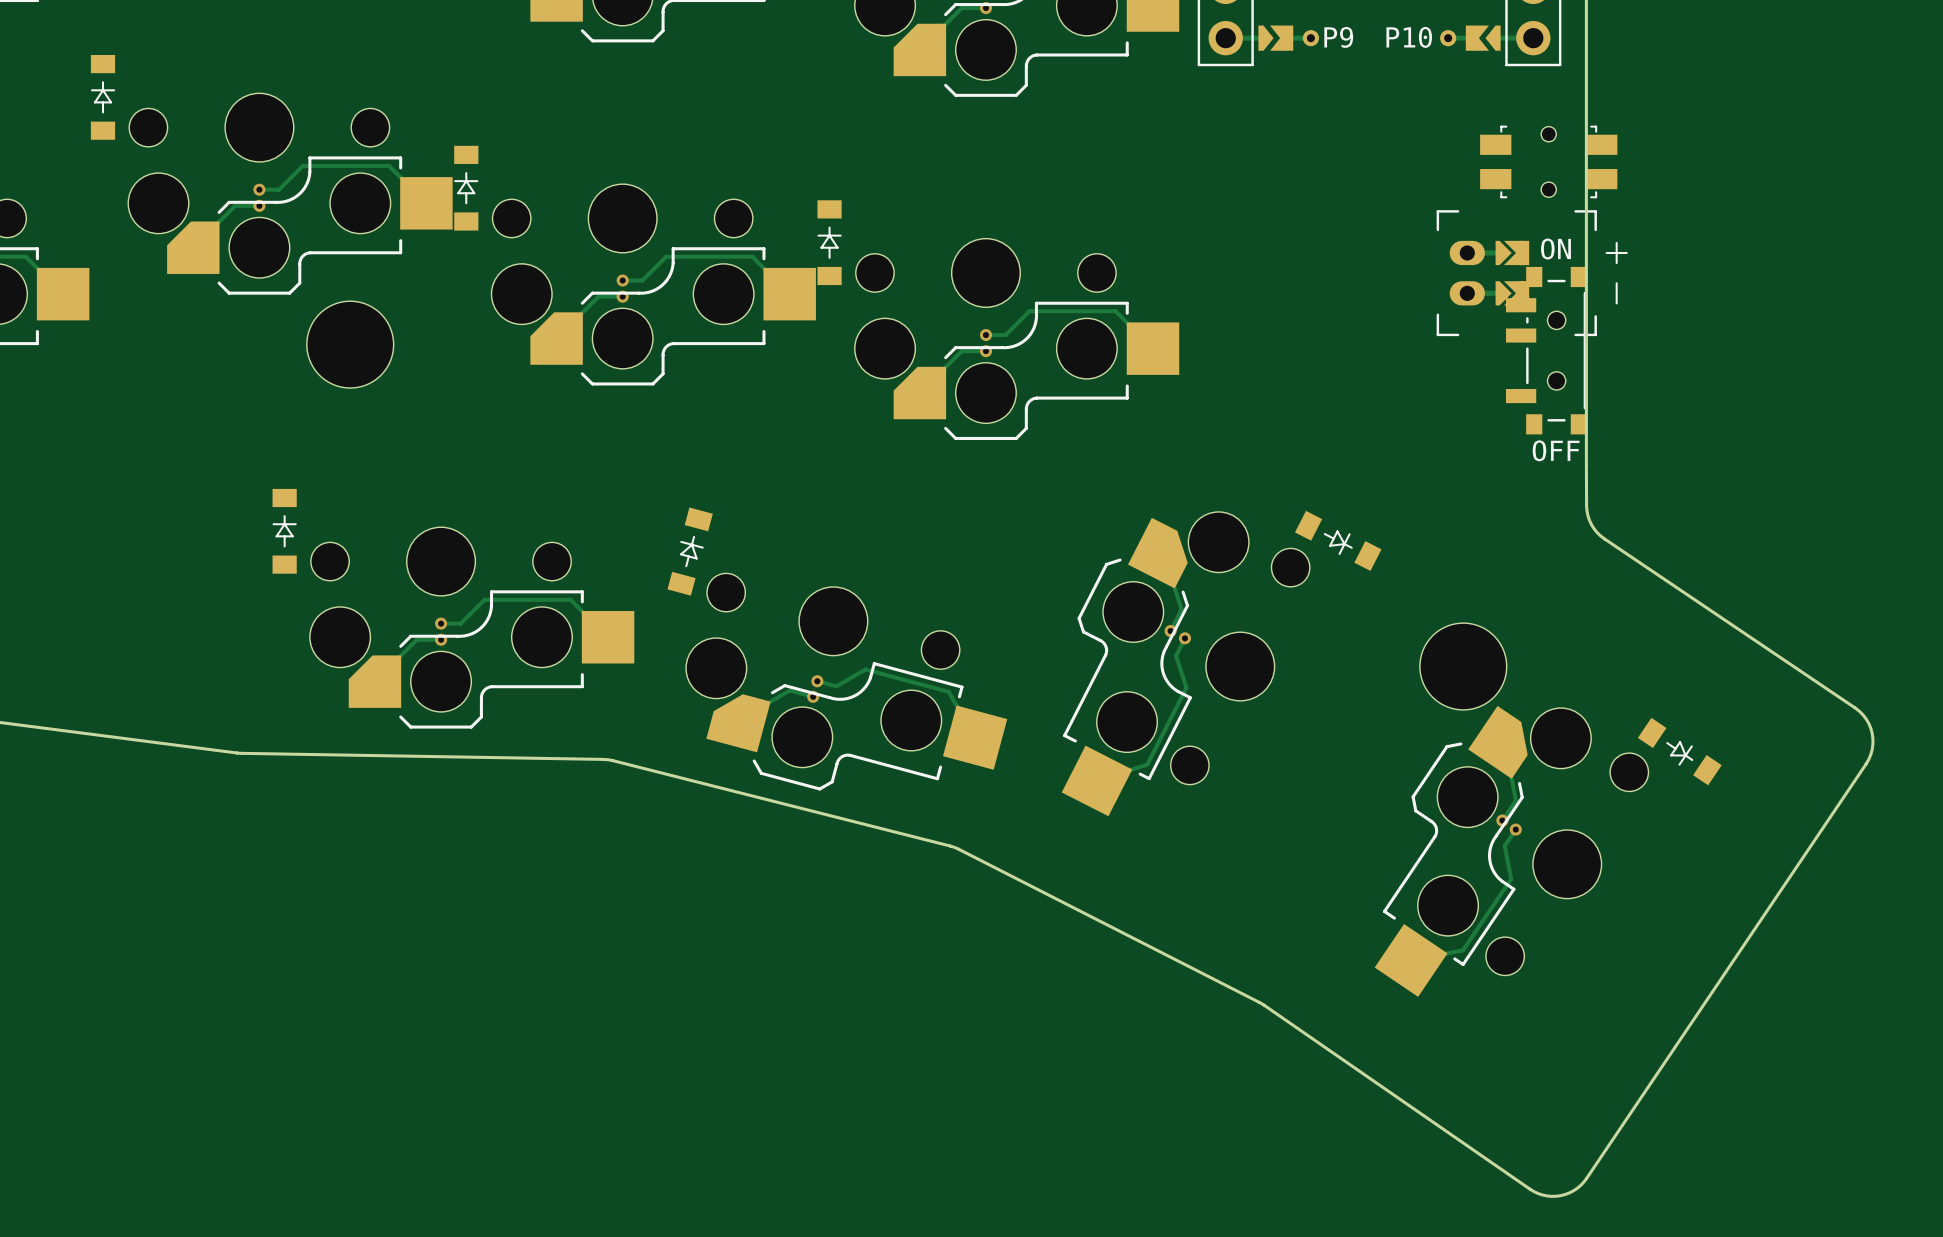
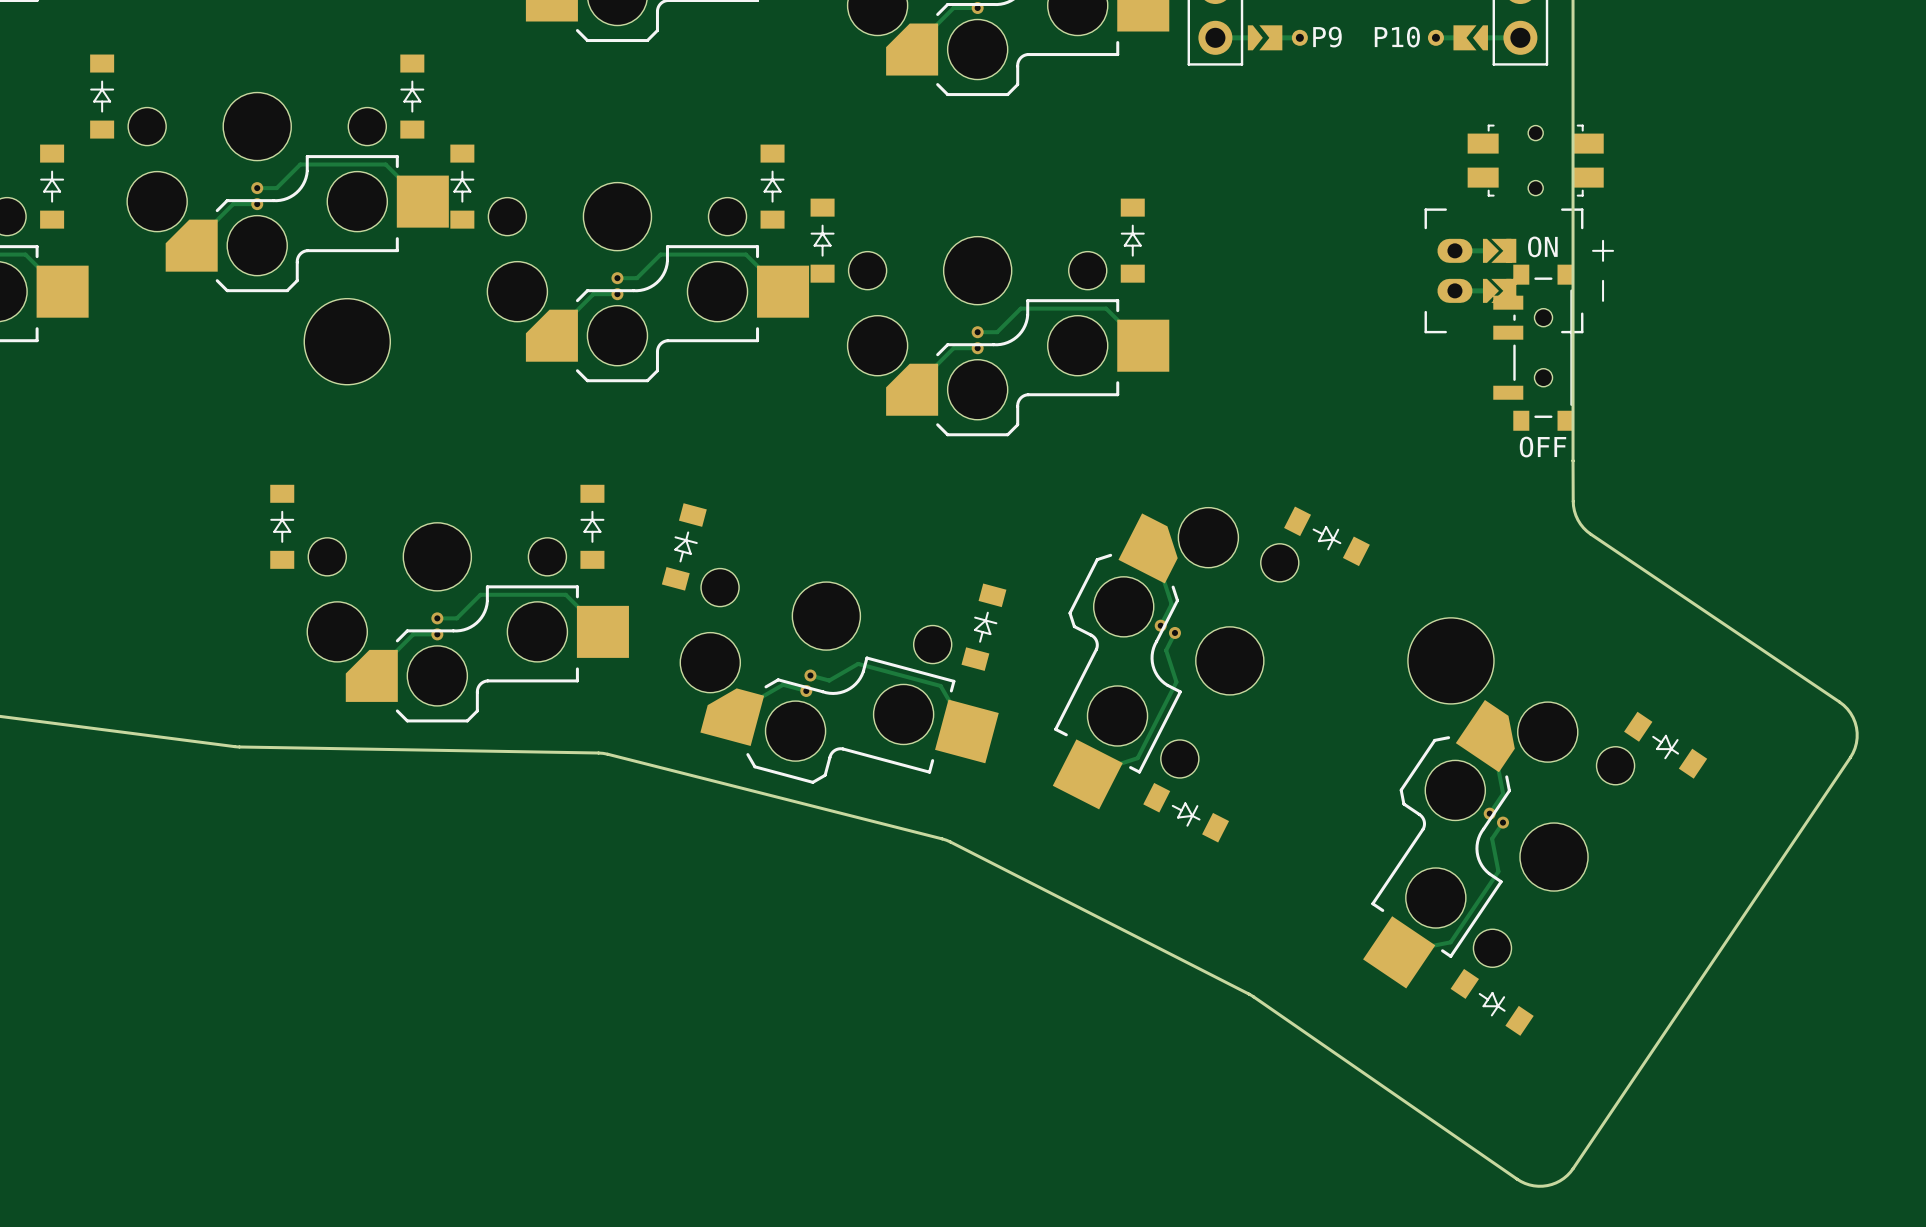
part: none -> (412, 96)
part: none -> (52, 186)
part: none -> (772, 186)
part: none -> (1132, 240)
part: none -> (592, 526)
part: none -> (983, 627)
part: none -> (1186, 812)
part: none -> (1492, 1002)

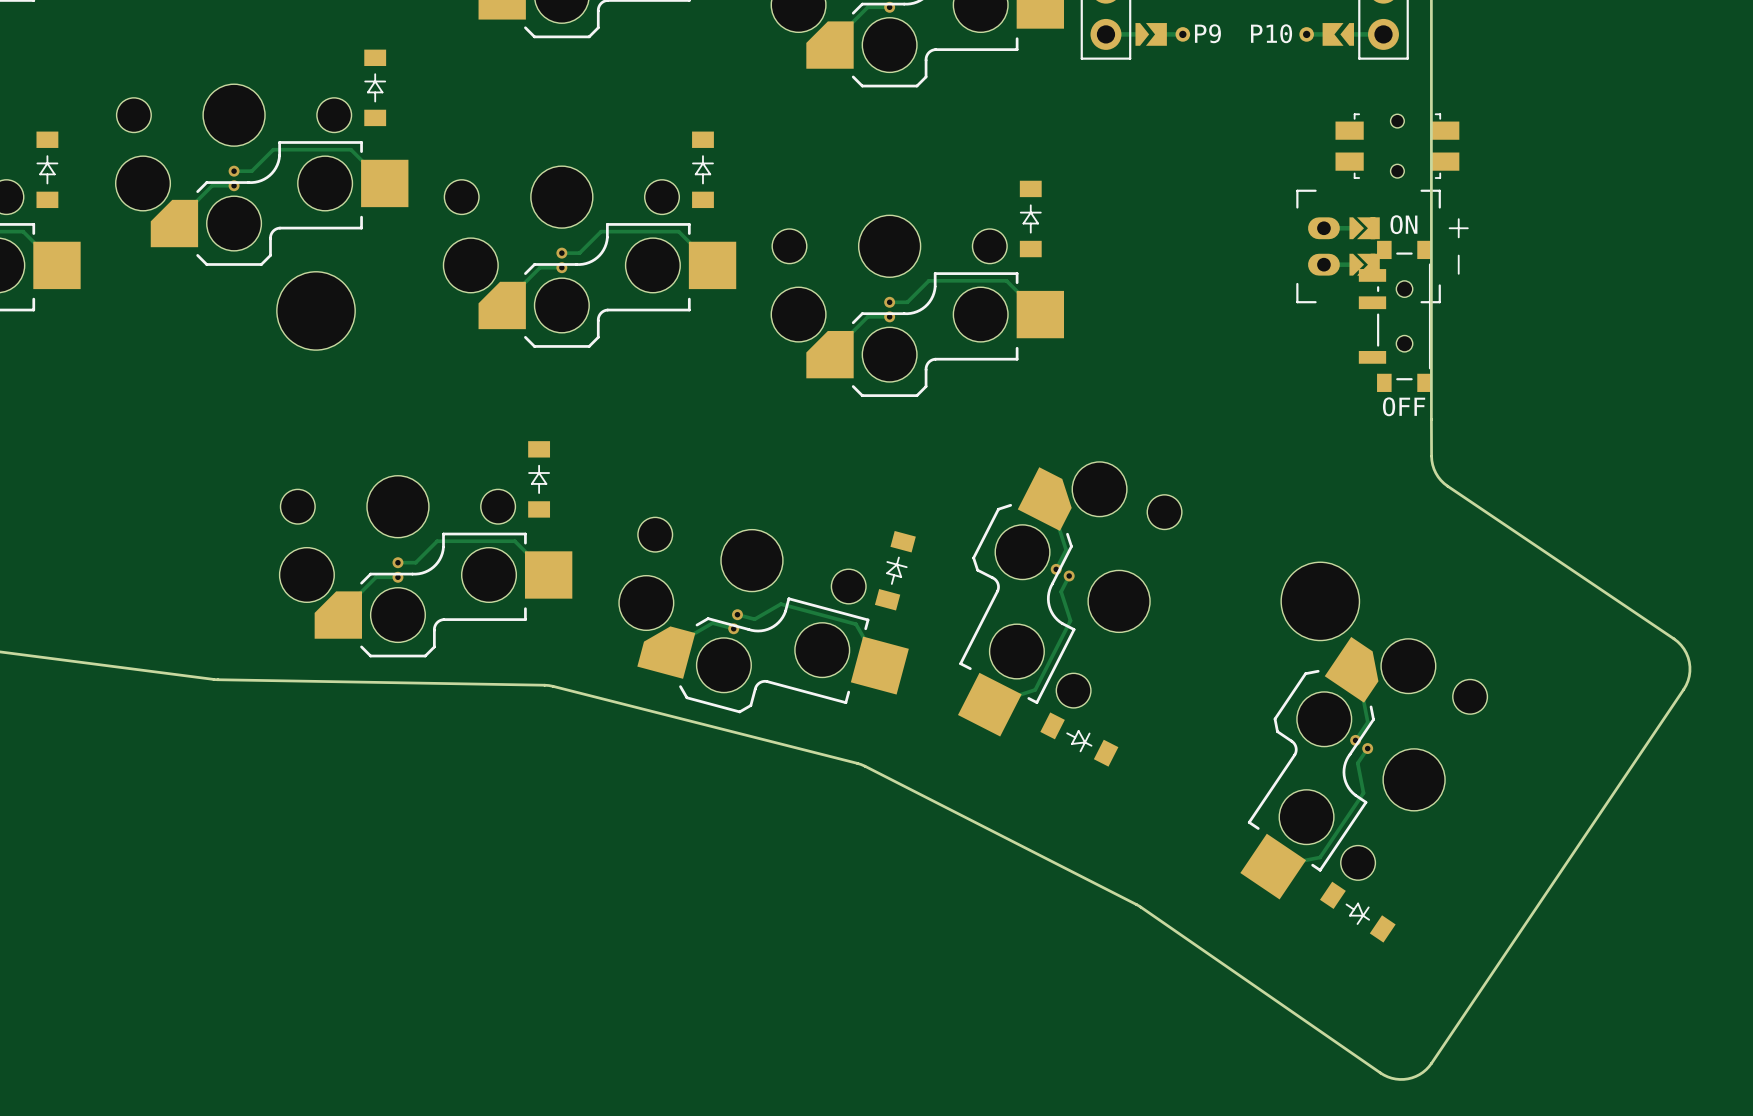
part: (102, 96) -> none
part: (462, 186) -> none
part: (822, 240) -> none
part: (282, 526) -> none
part: (1326, 536) -> none
part: (684, 546) -> none
part: (1665, 745) -> none

